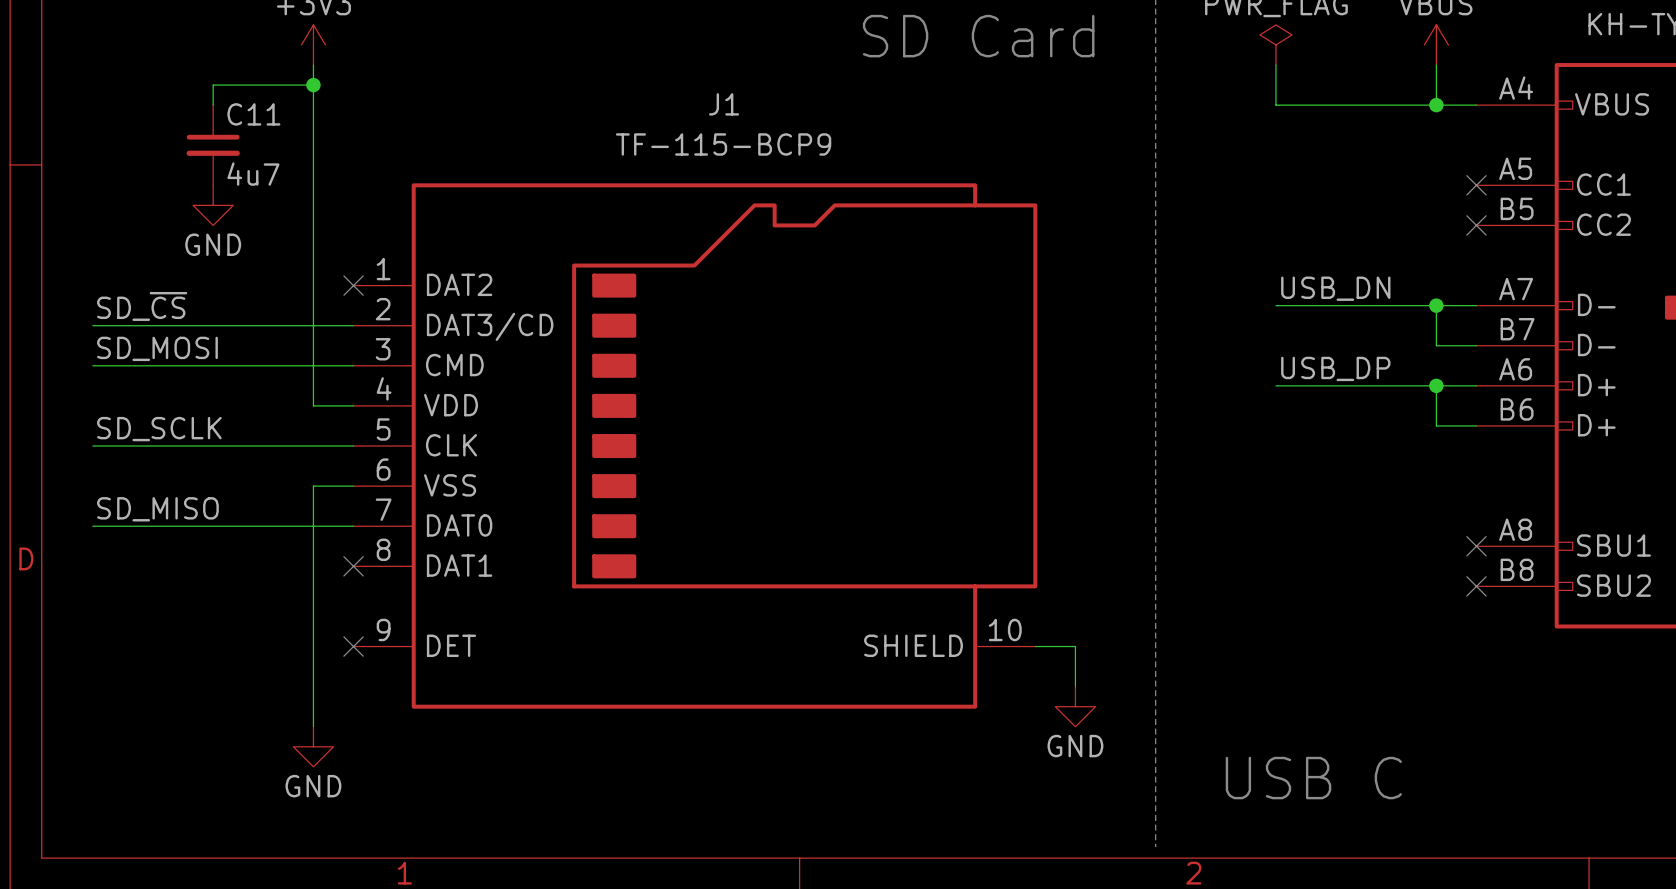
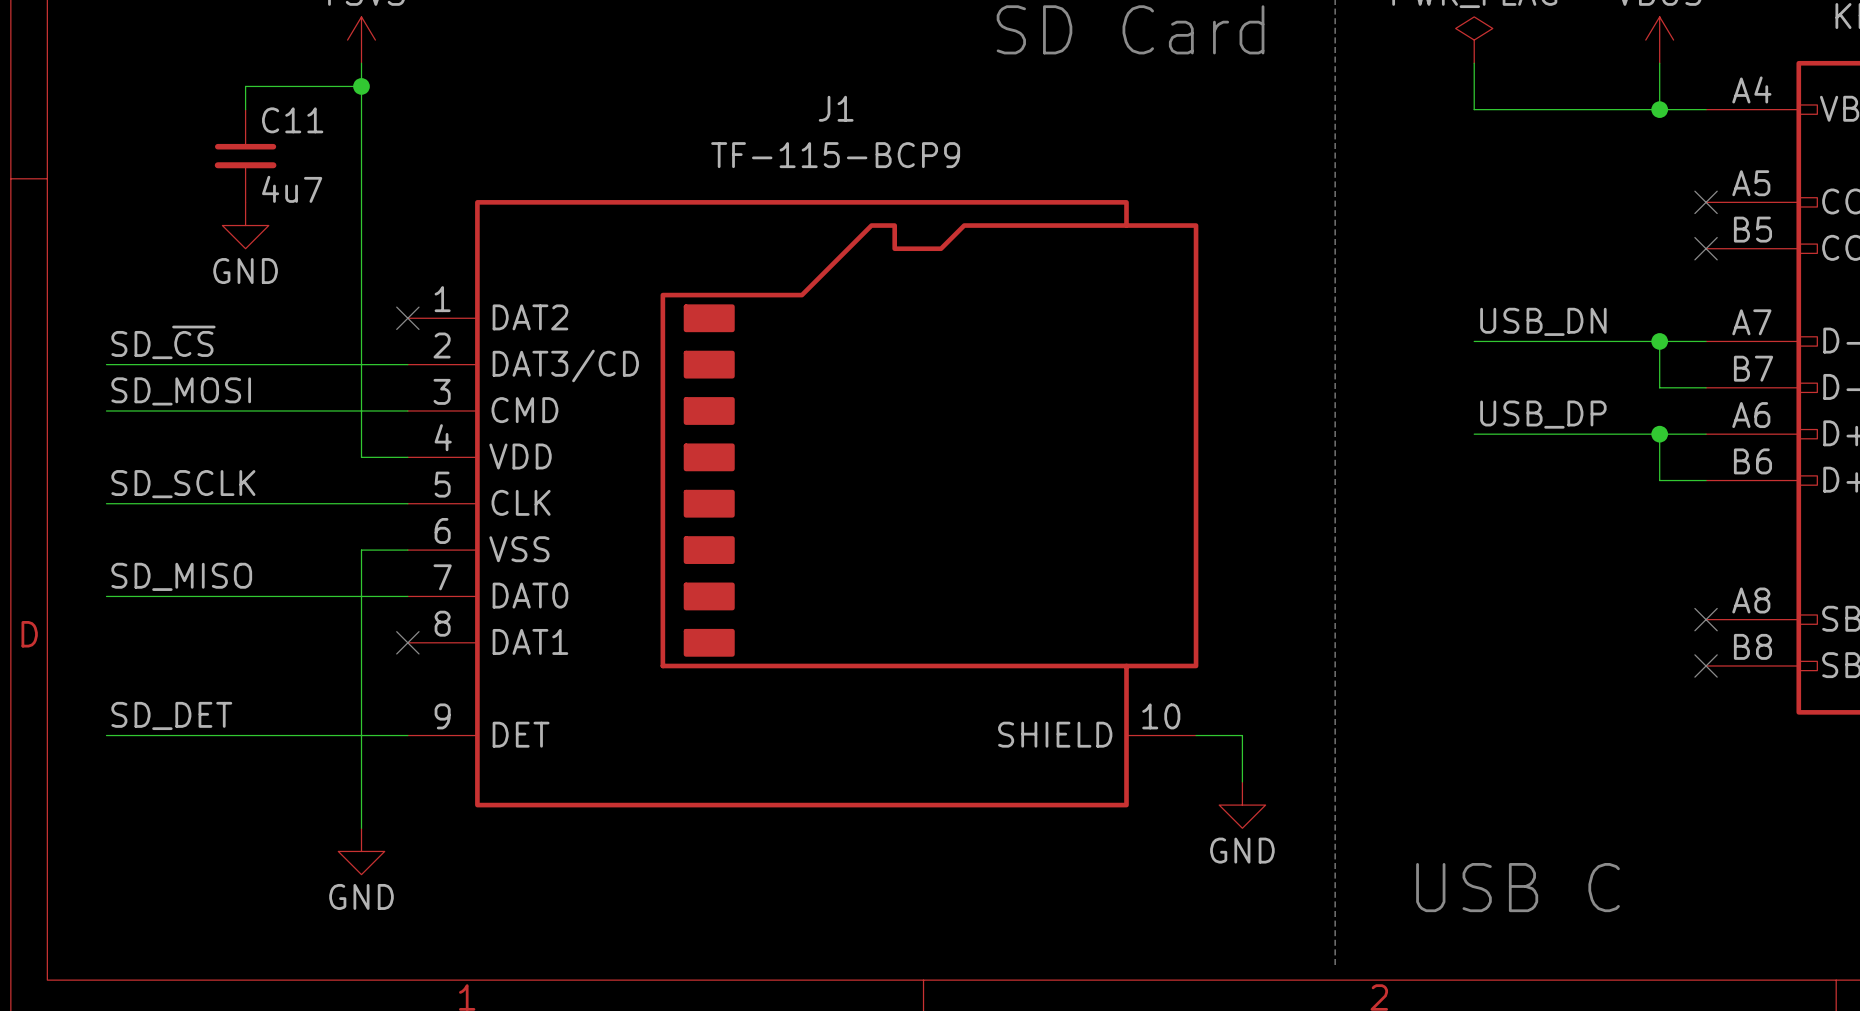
label: none -> SD_DET (171, 715)
wire: none -> (106, 735) (407, 735)
no-connect mark: (353, 646) -> none

